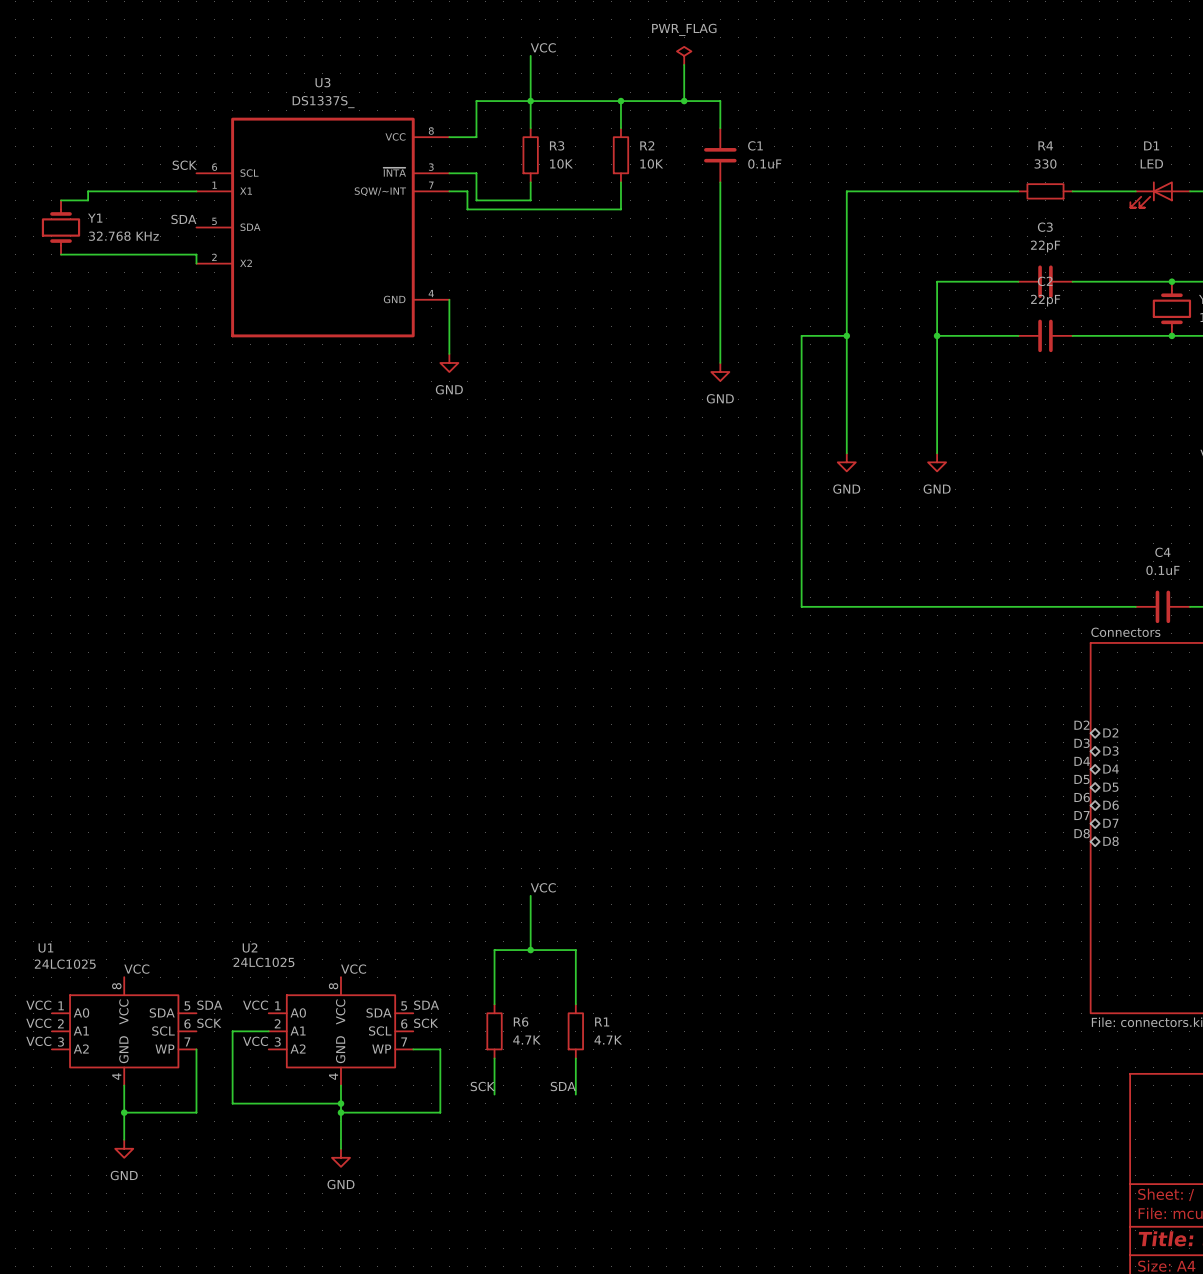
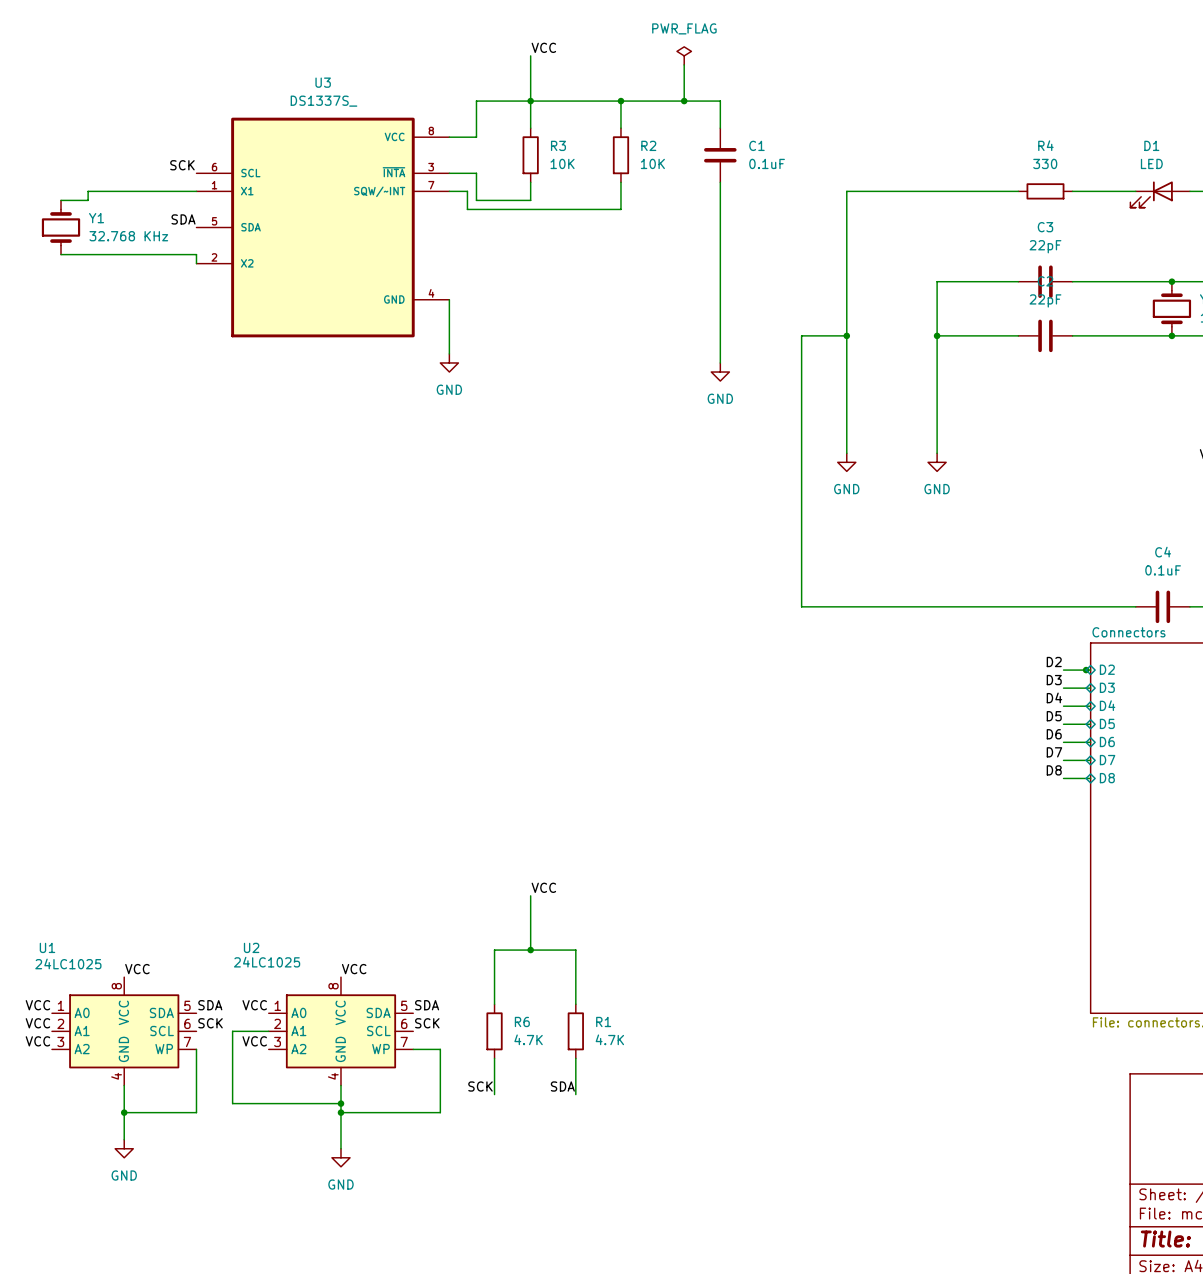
wire: none -> (1063, 670) (1090, 670)
junction: none -> (1086, 670)
wire: none -> (1063, 688) (1090, 688)
wire: none -> (1063, 706) (1090, 706)
wire: none -> (1063, 724) (1090, 724)
label position: D2 (1081, 725) -> D2 (1054, 662)
sheet pin position: D2 (1110, 732) -> D2 (1107, 669)
wire: none -> (1063, 742) (1090, 742)
label position: D3 (1082, 743) -> D3 (1054, 680)
sheet pin position: D3 (1110, 751) -> D3 (1107, 687)
wire: none -> (1063, 760) (1090, 760)
label position: D4 (1082, 761) -> D4 (1054, 697)
sheet pin position: D4 (1111, 769) -> D4 (1107, 705)
wire: none -> (1063, 778) (1090, 778)
label position: D5 (1081, 779) -> D5 (1054, 716)
sheet pin position: D5 (1110, 787) -> D5 (1107, 723)
label position: D6 (1082, 797) -> D6 (1054, 734)
sheet pin position: D6 (1111, 805) -> D6 (1107, 741)
label position: D7 (1082, 815) -> D7 (1054, 752)
sheet pin position: D7 (1110, 823) -> D7 (1107, 760)
label position: D8 (1082, 833) -> D8 (1054, 770)
sheet pin position: D8 (1111, 841) -> D8 (1107, 778)

